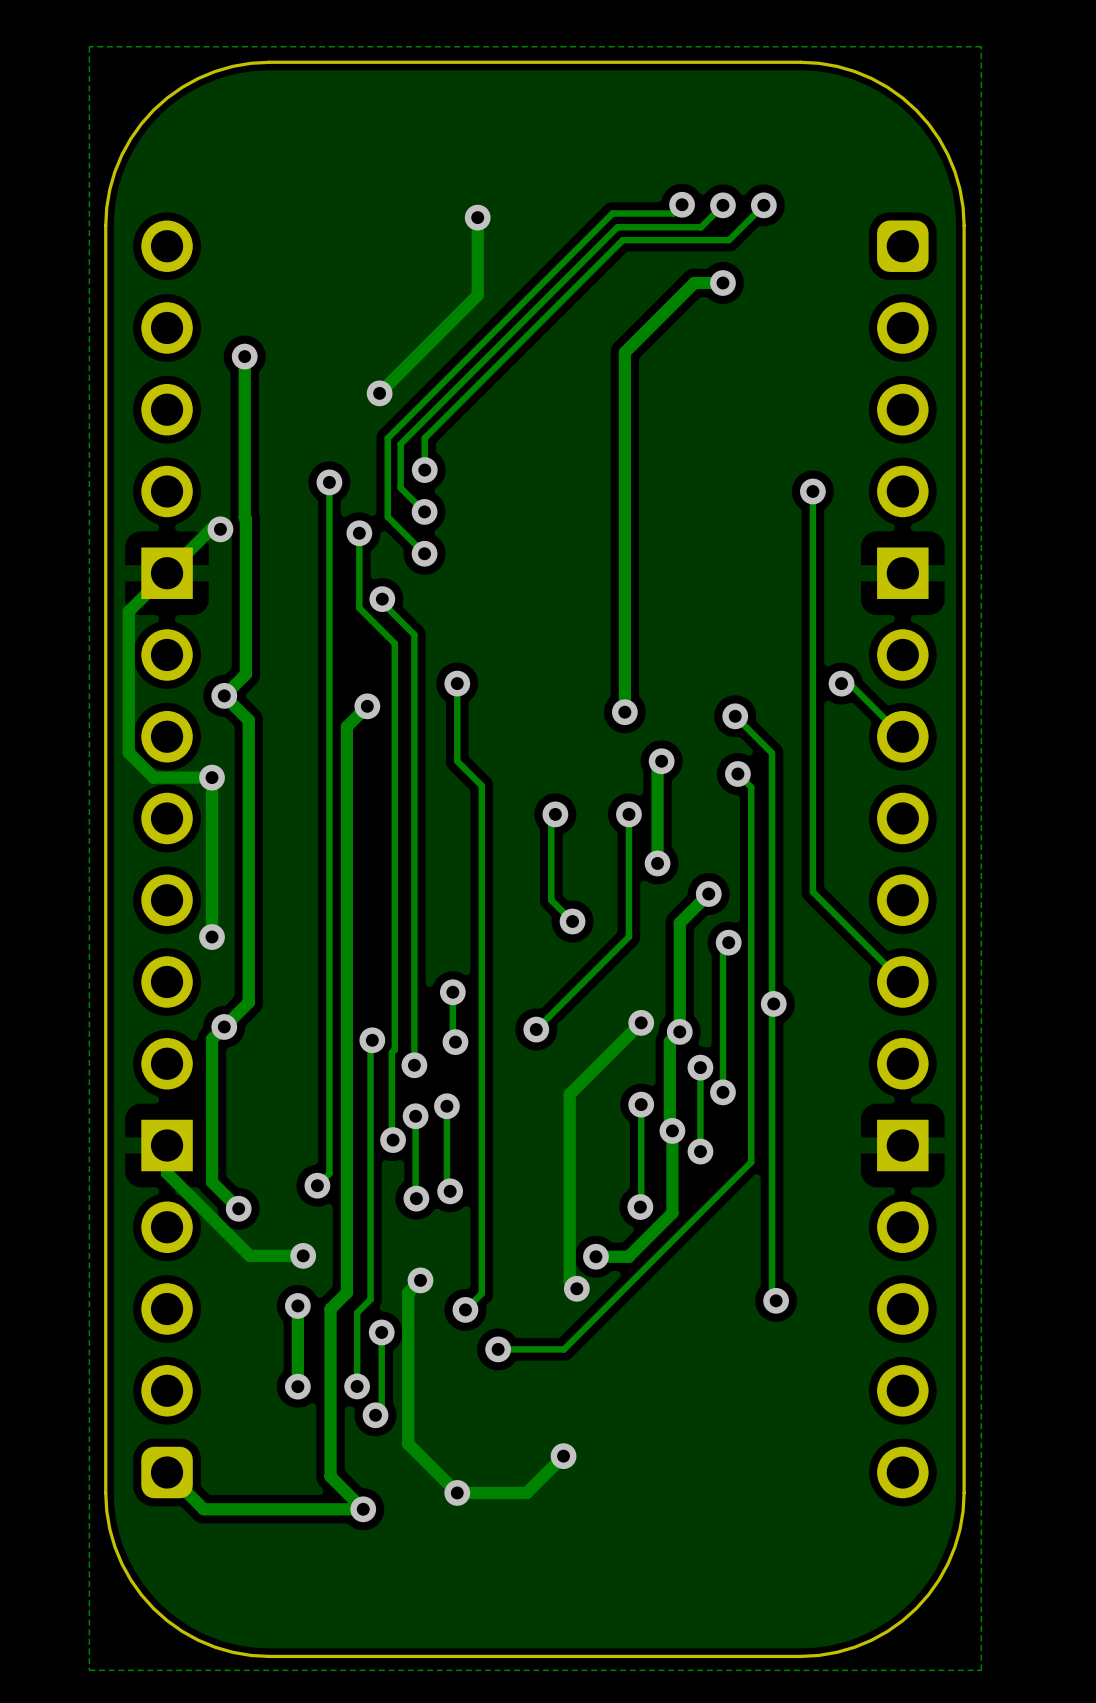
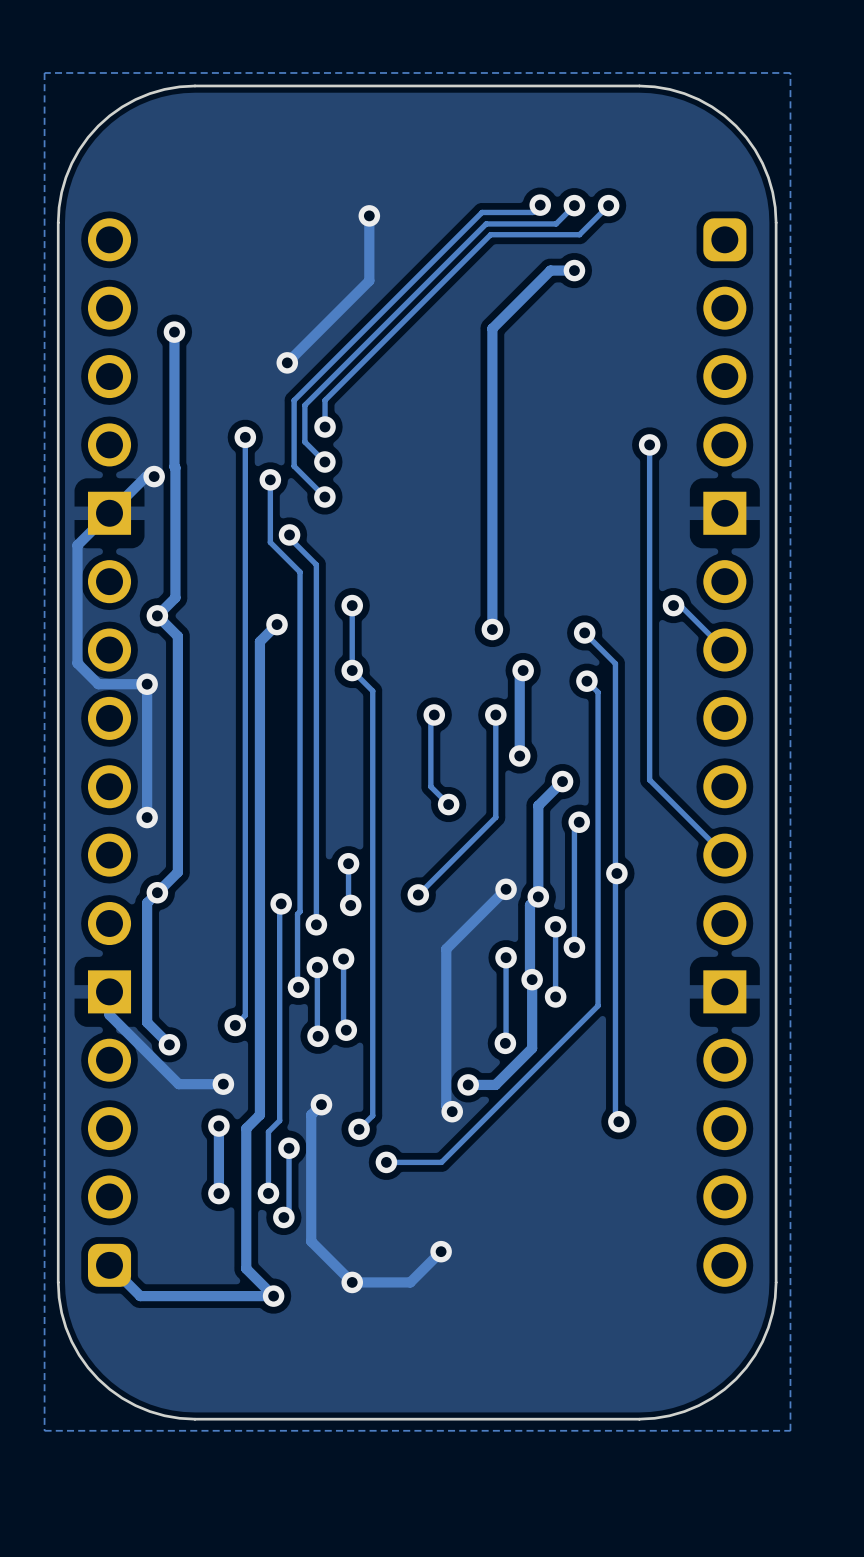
via: none -> (352, 670)

